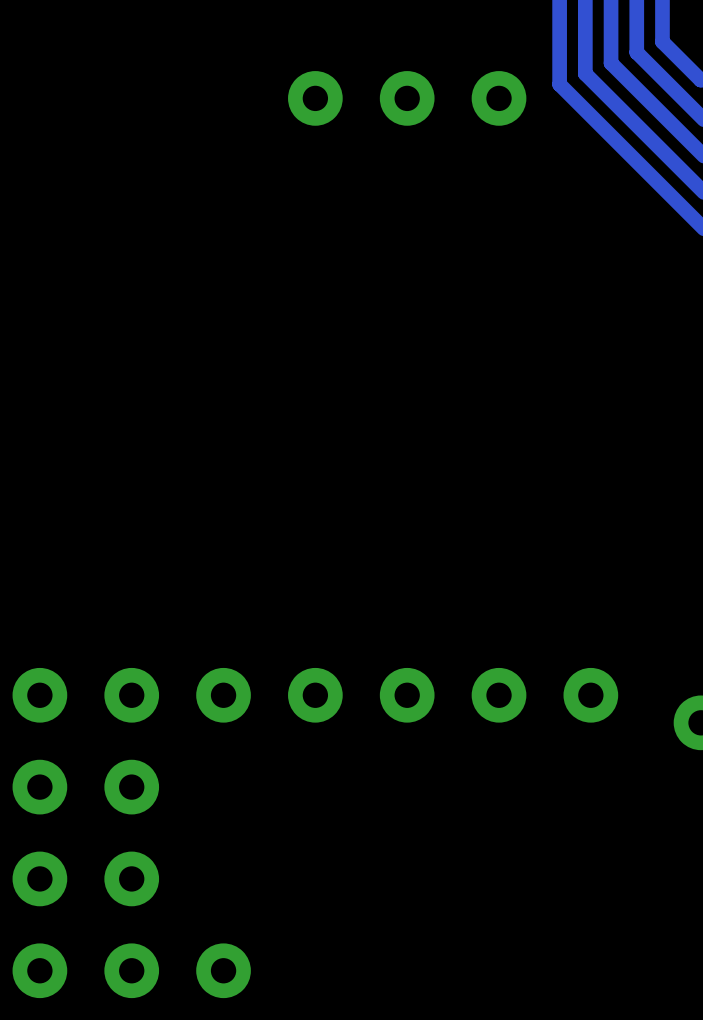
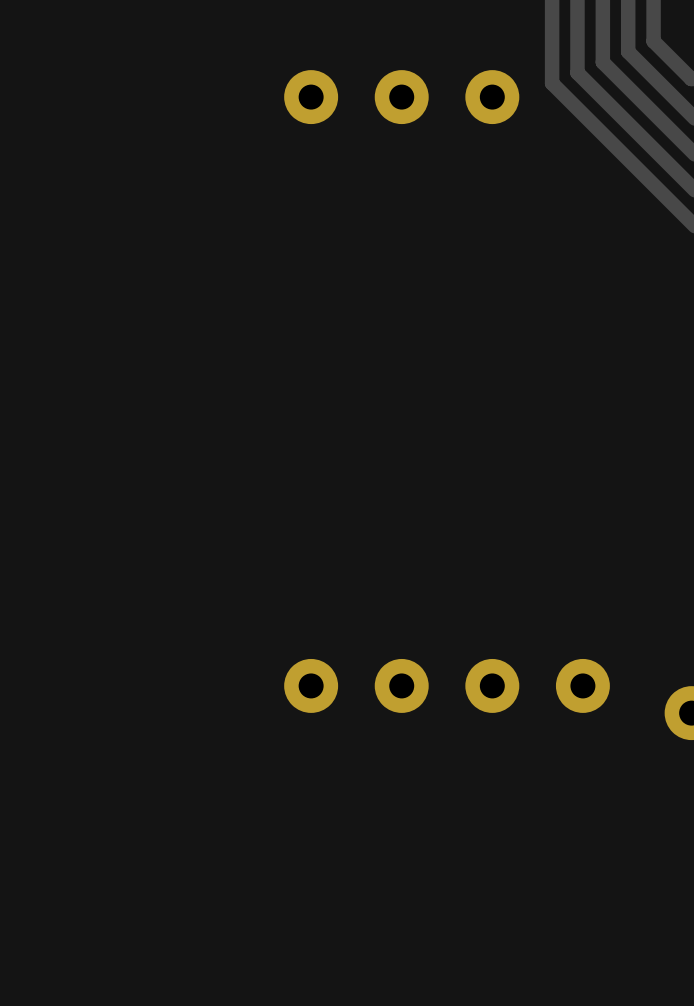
via: (39, 695) -> none
via: (131, 695) -> none
via: (223, 695) -> none
via: (39, 787) -> none
via: (131, 787) -> none
via: (39, 878) -> none
via: (131, 878) -> none
via: (39, 970) -> none
via: (131, 970) -> none
via: (223, 970) -> none

